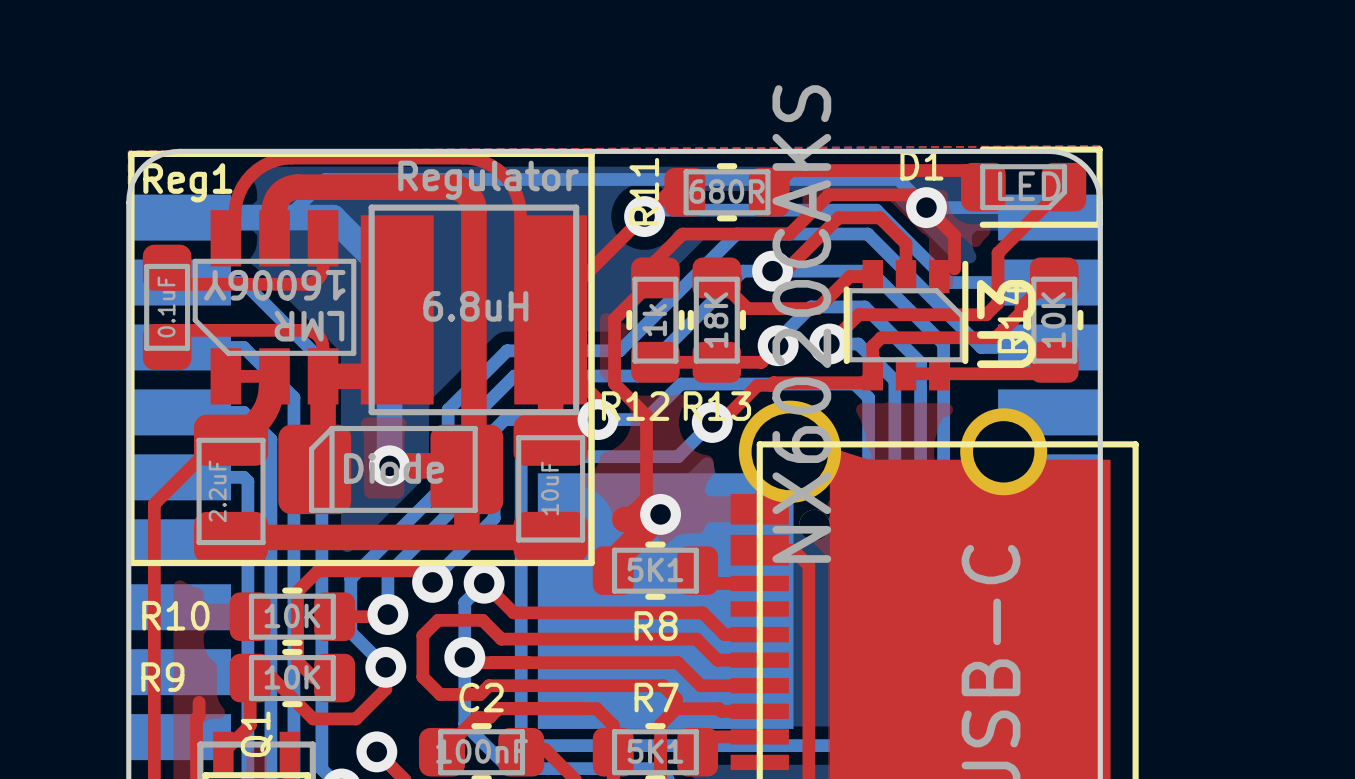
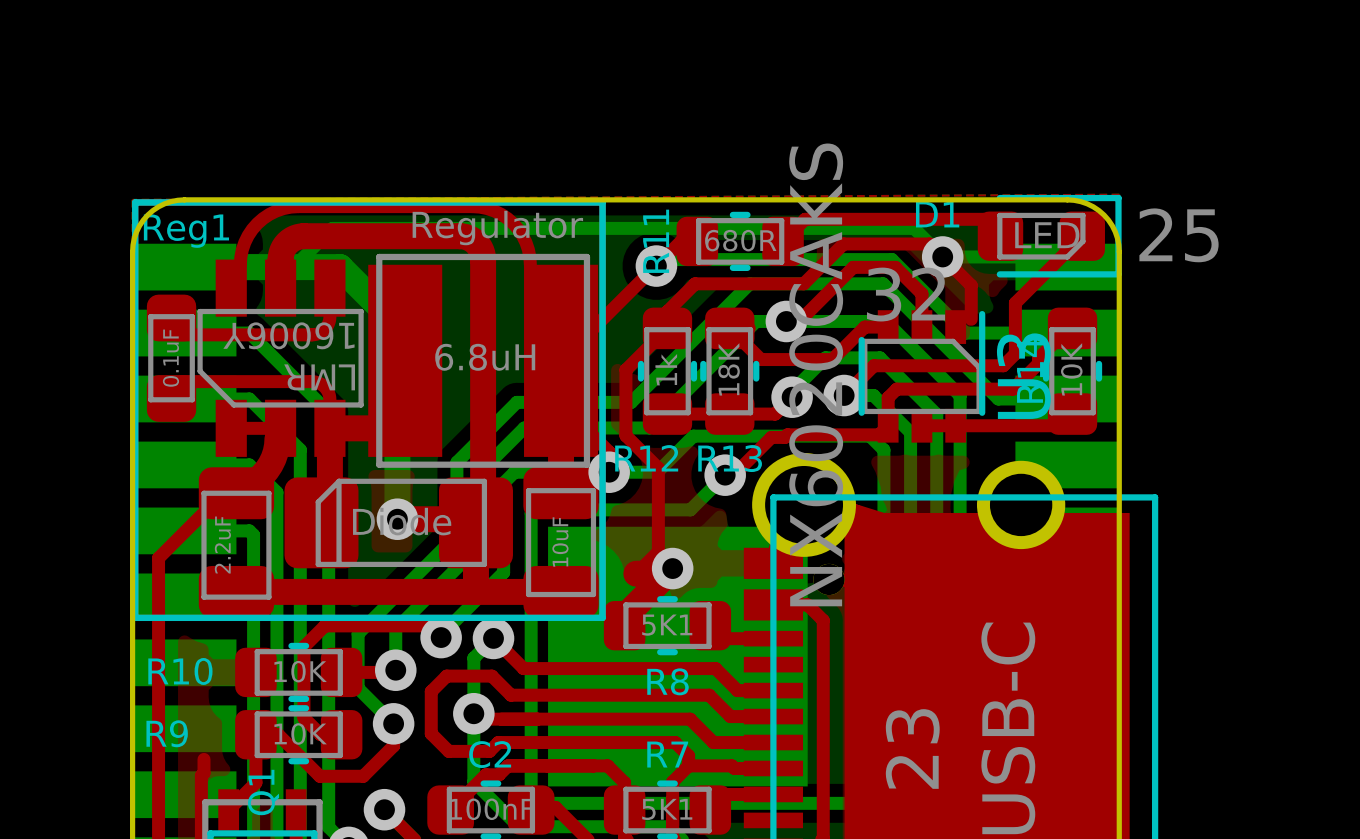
text: none -> 25 (1179, 235)
text: none -> 32 (906, 294)
text: none -> 23 (912, 749)

